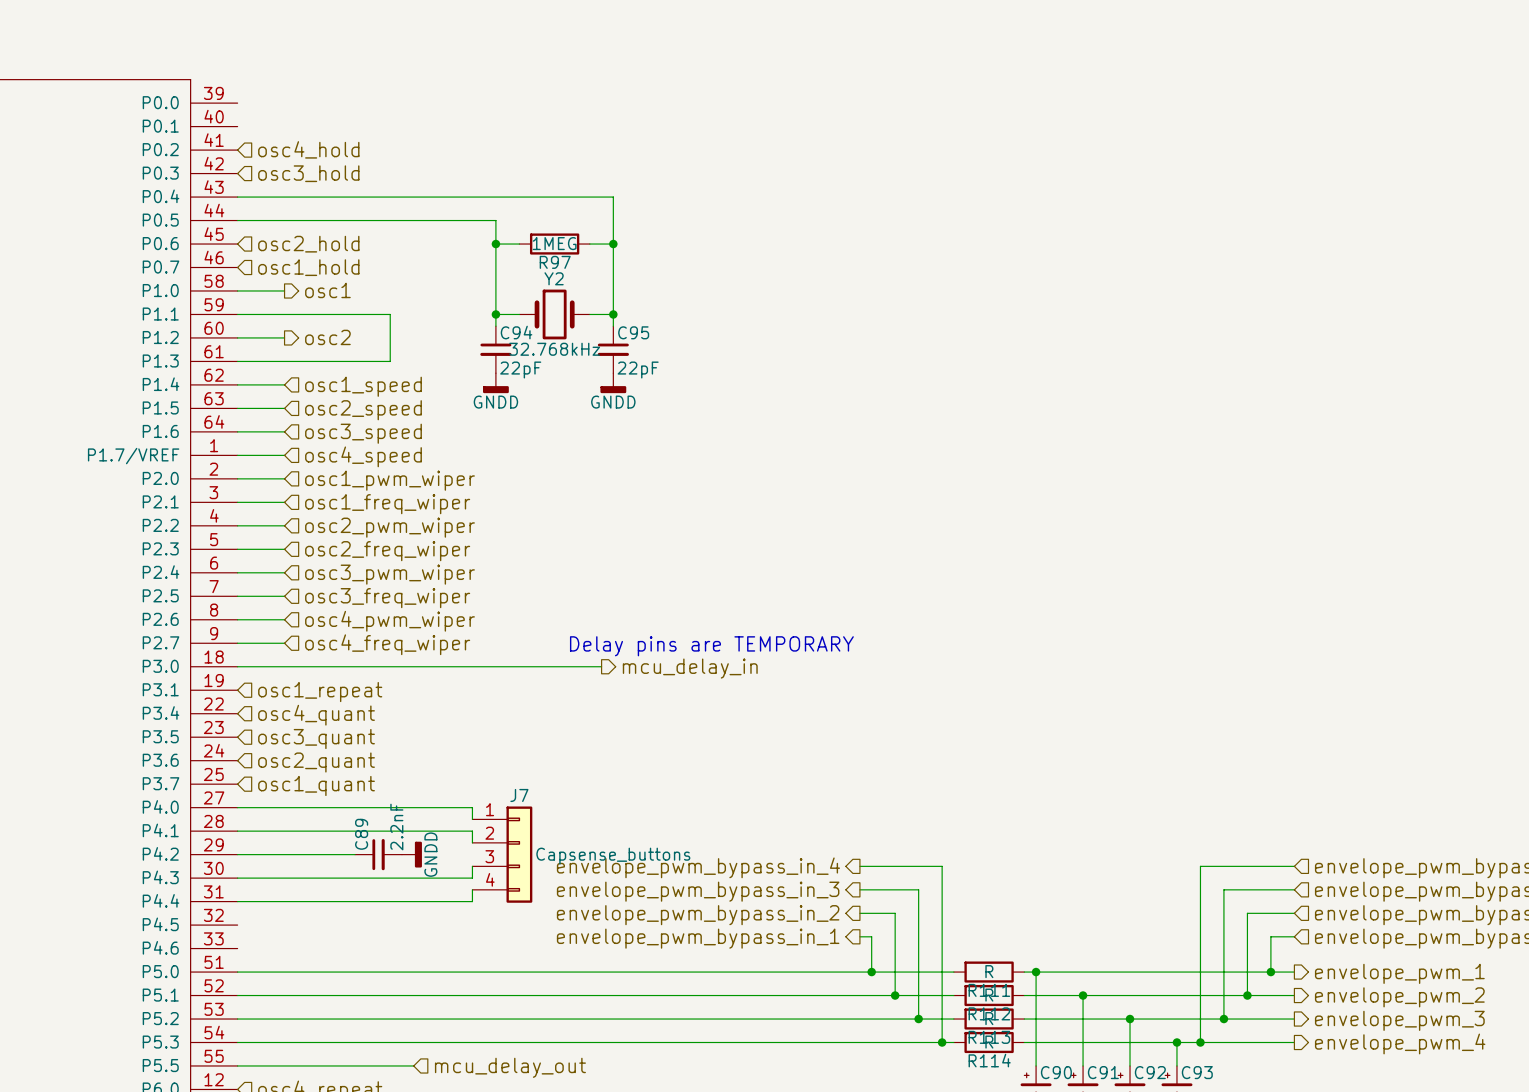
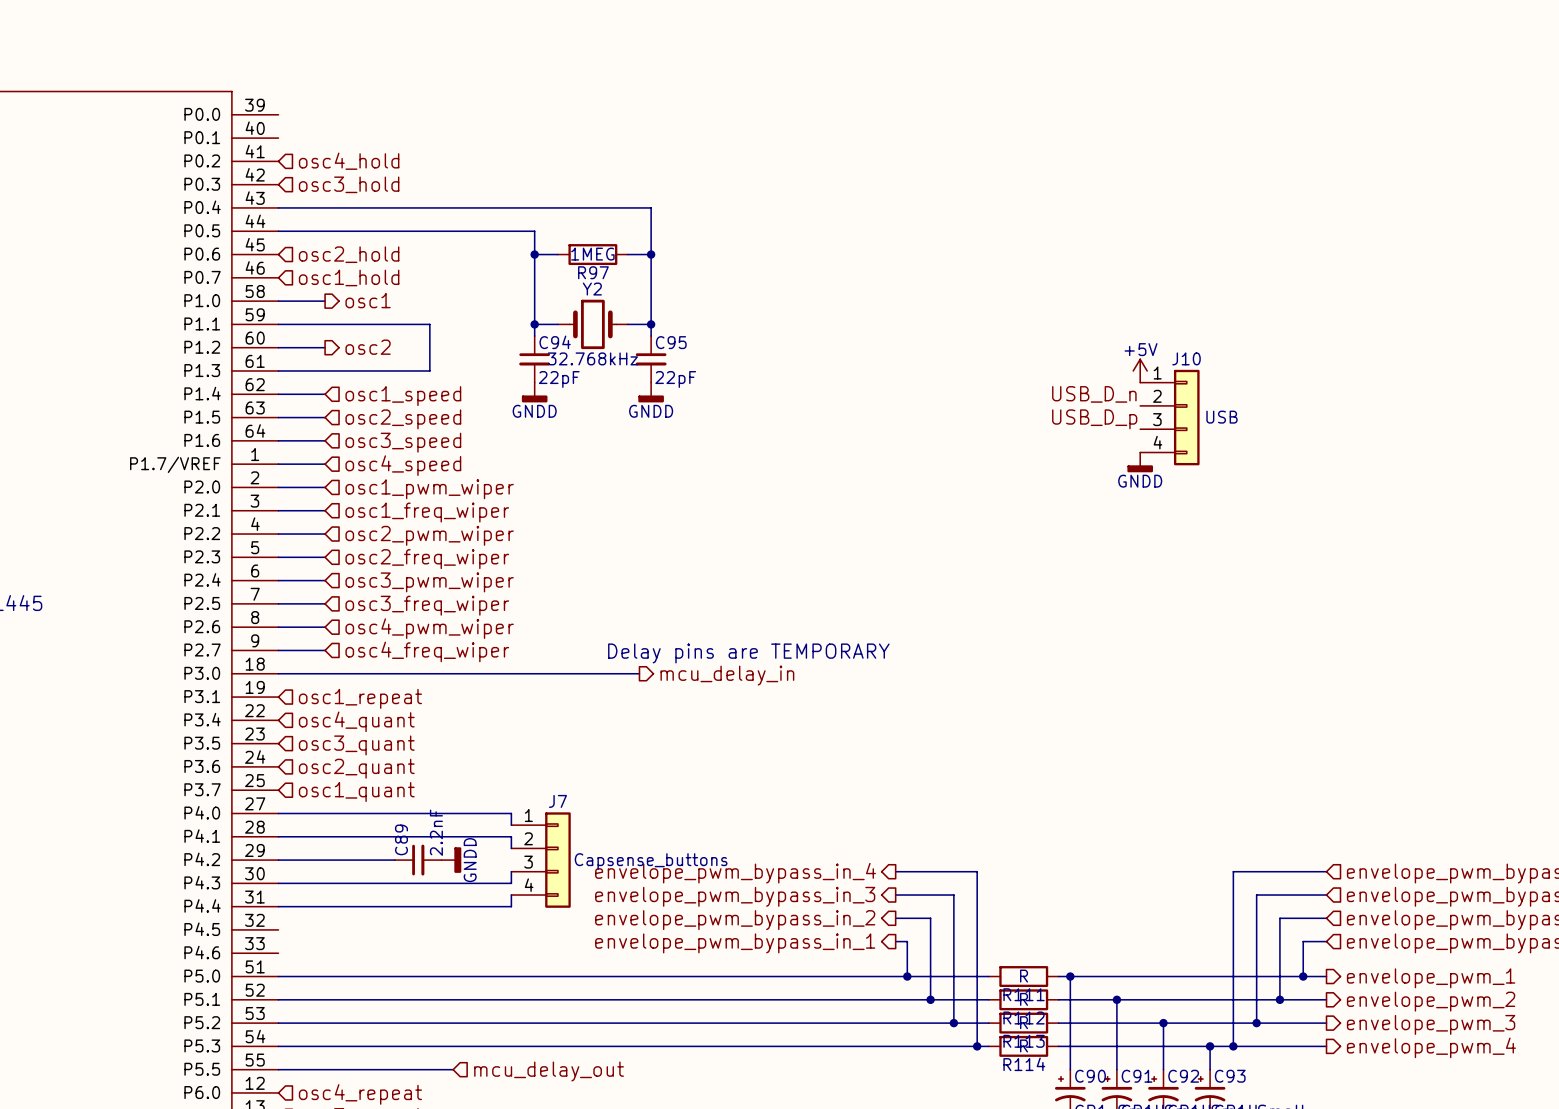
power symbol: none -> +5V (1140, 370)
label: none -> USB_D_n (1094, 394)
J10: none -> USB (1169, 417)
label: none -> USB_D_p (1094, 419)
power symbol: none -> GNDD (1140, 462)

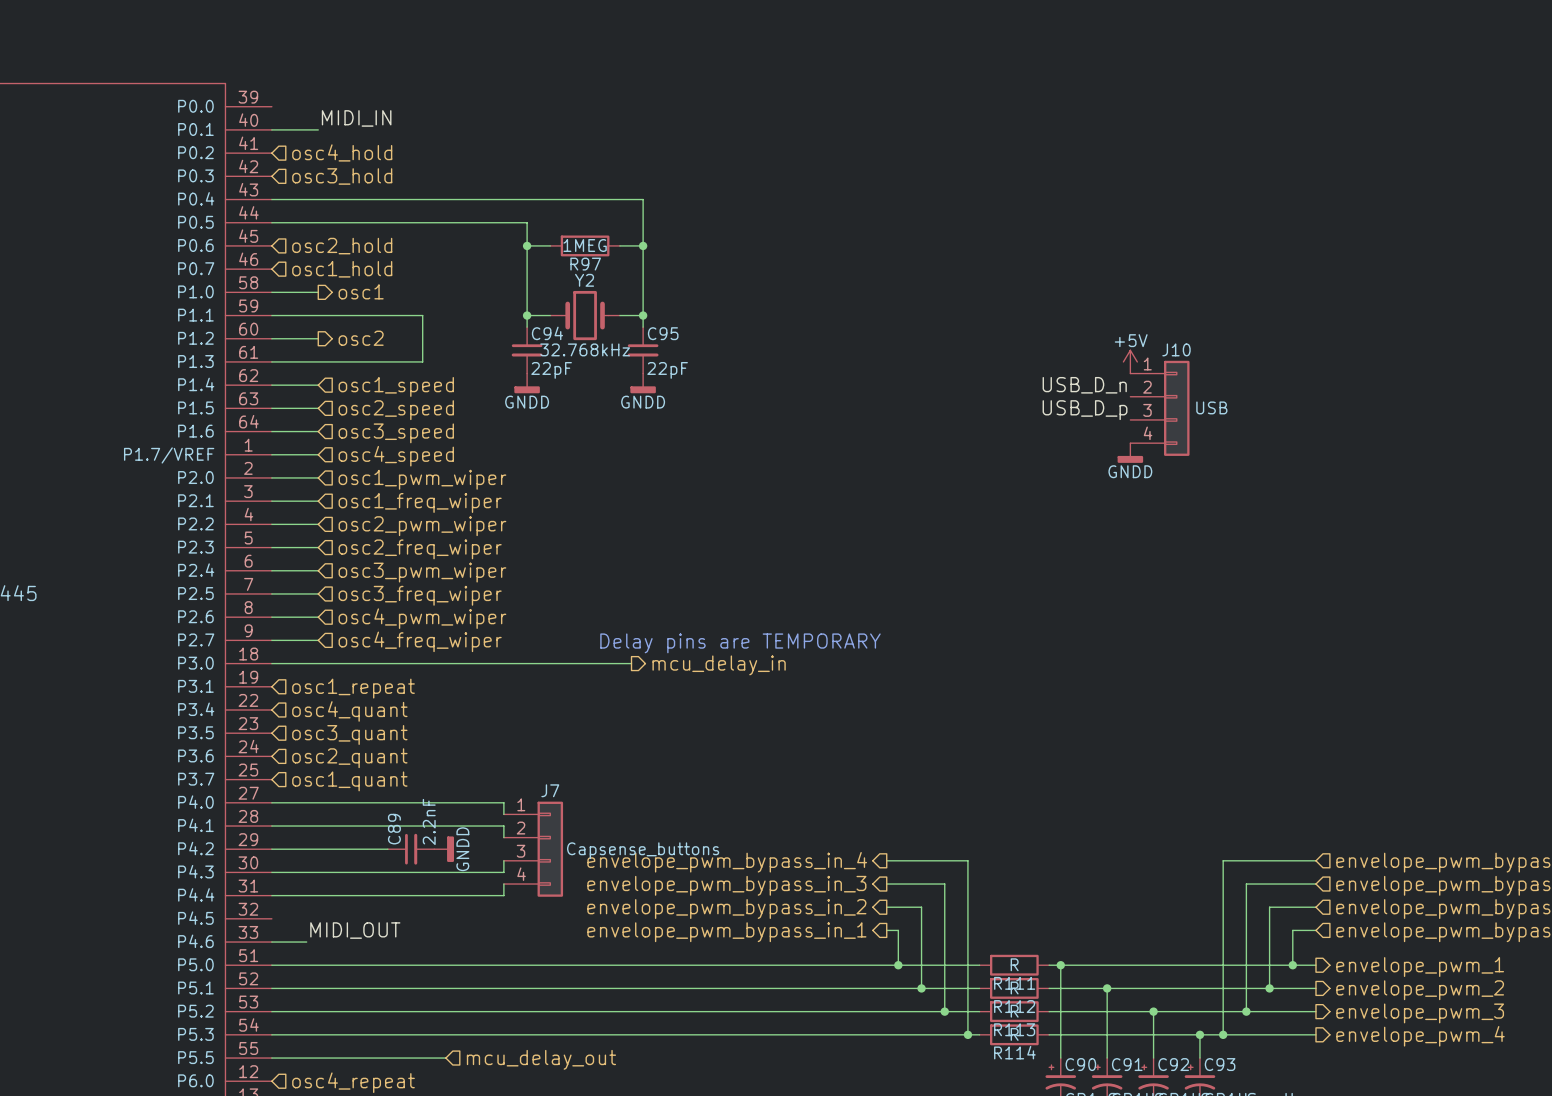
label: none -> MIDI_IN (356, 118)
wire: none -> (271, 129) (318, 129)
label: none -> MIDI_OUT (355, 930)
wire: none -> (271, 942) (306, 942)

